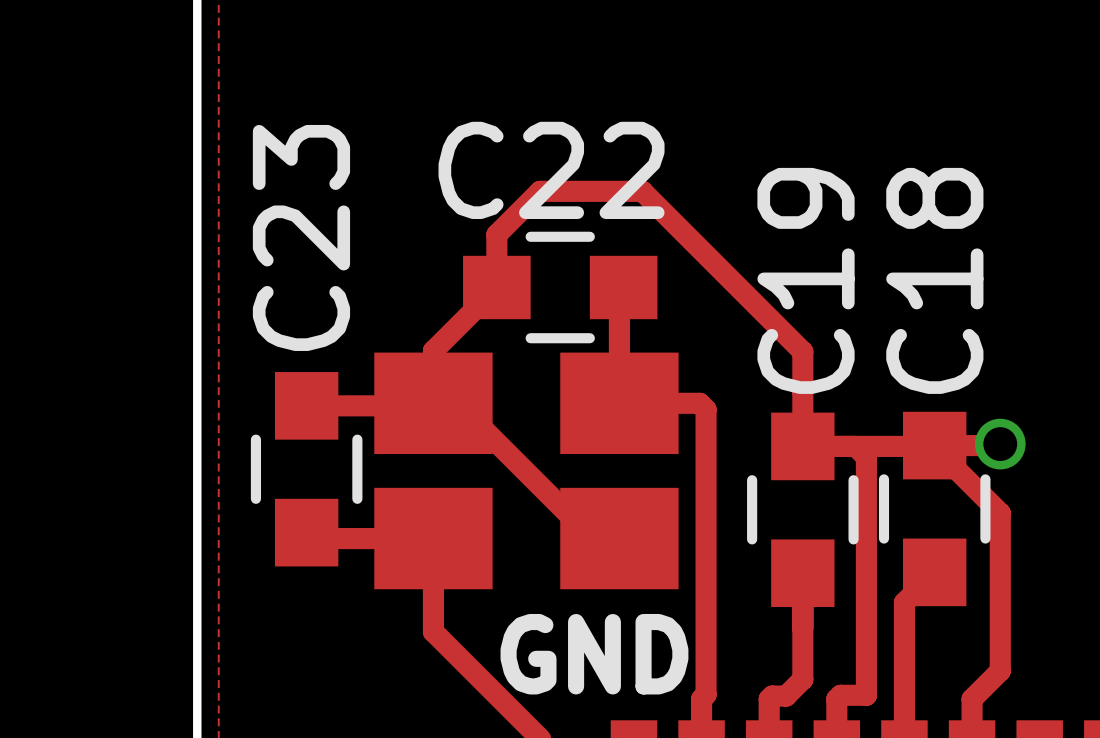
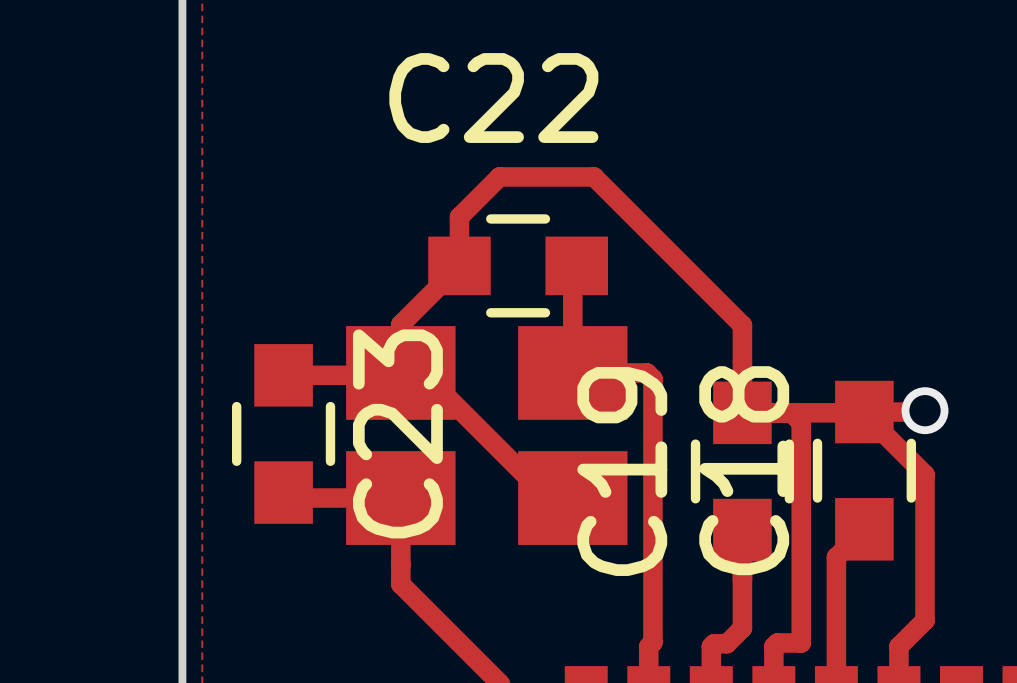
C22 name position: C22 (551, 170) -> C22 (493, 98)
C23 name position: C23 (301, 237) -> C23 (397, 433)
C19 name position: C19 (806, 280) -> C19 (622, 471)
C18 name position: C18 (934, 280) -> C18 (744, 470)
text: GND (594, 654) -> none

